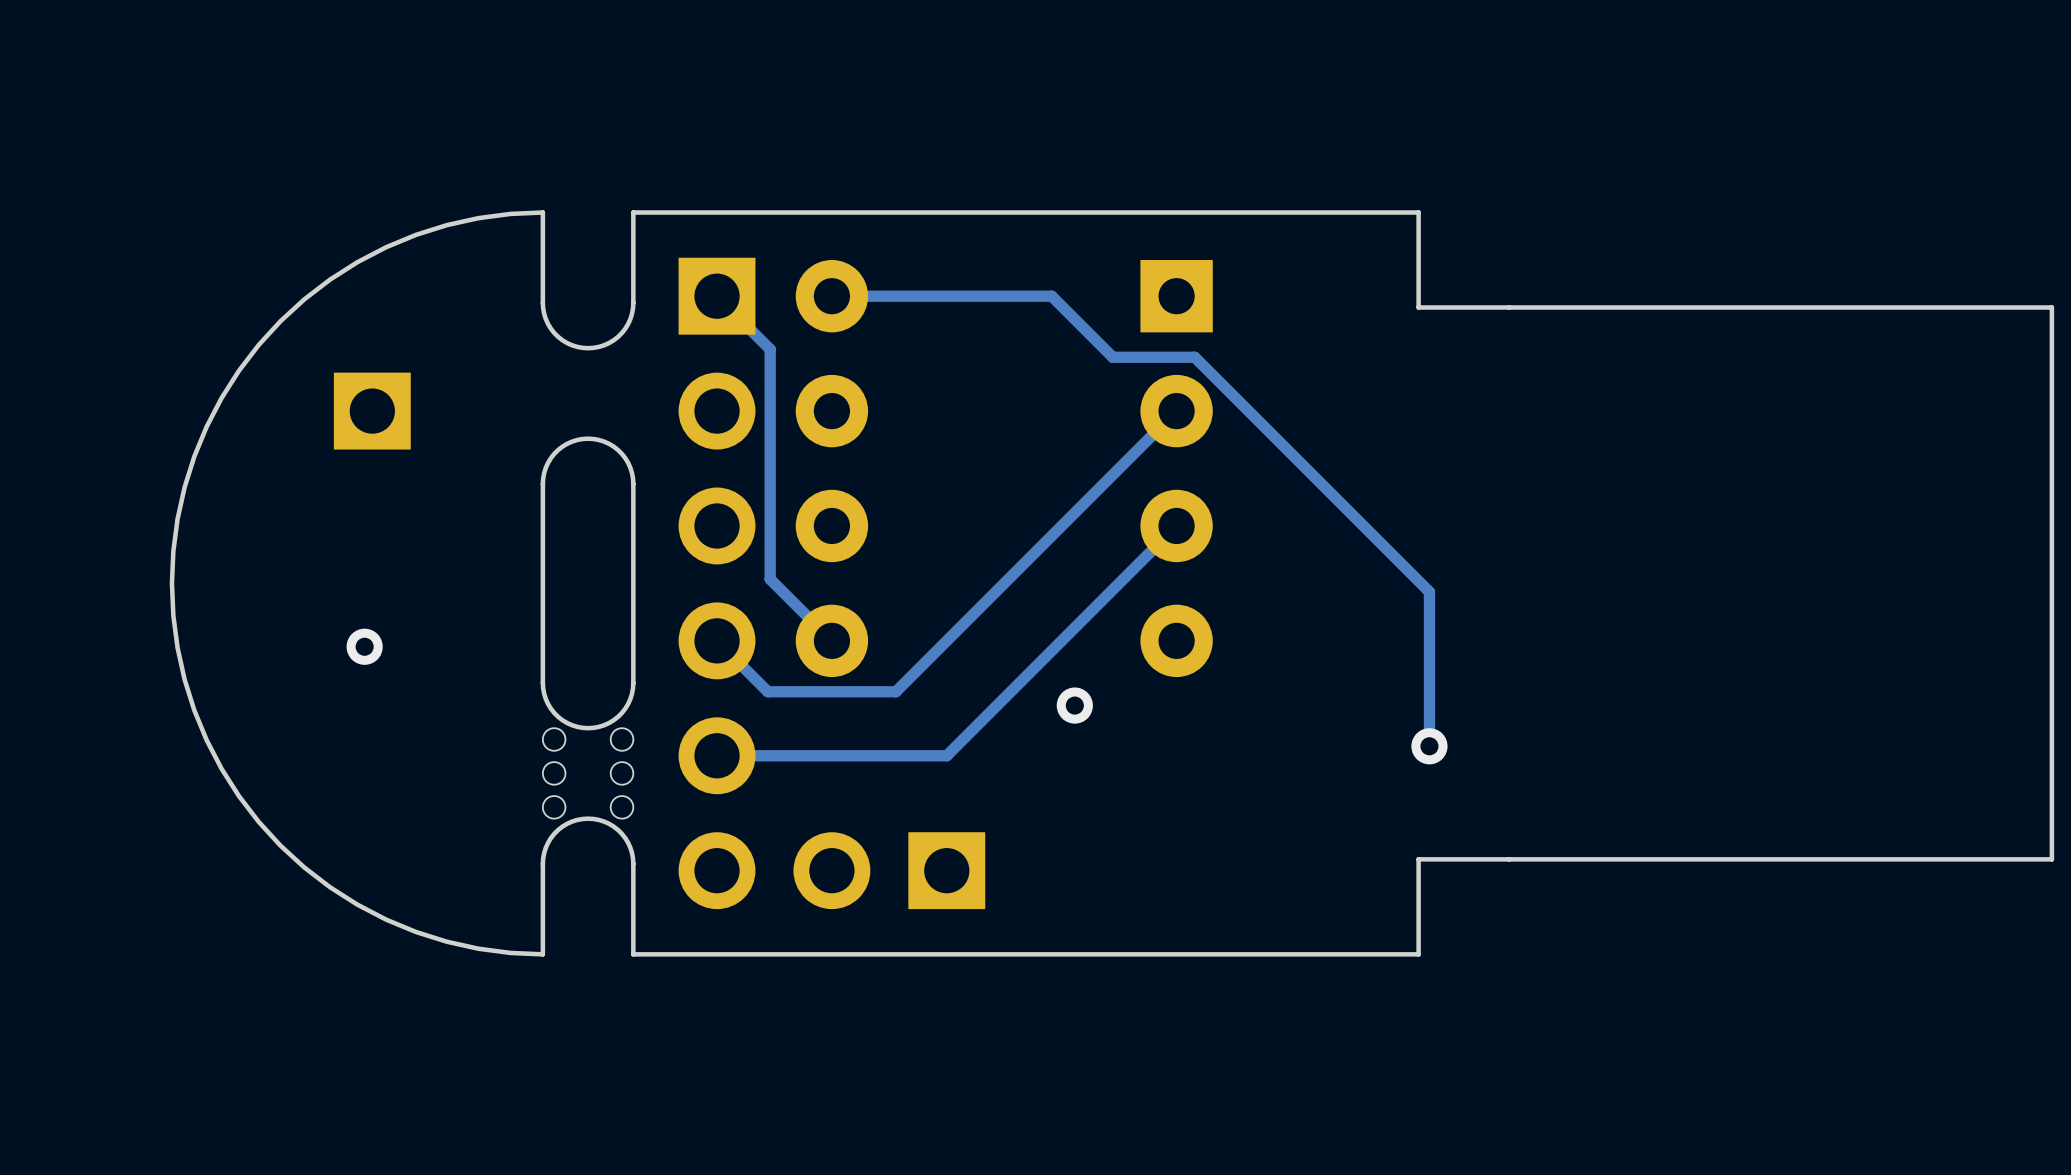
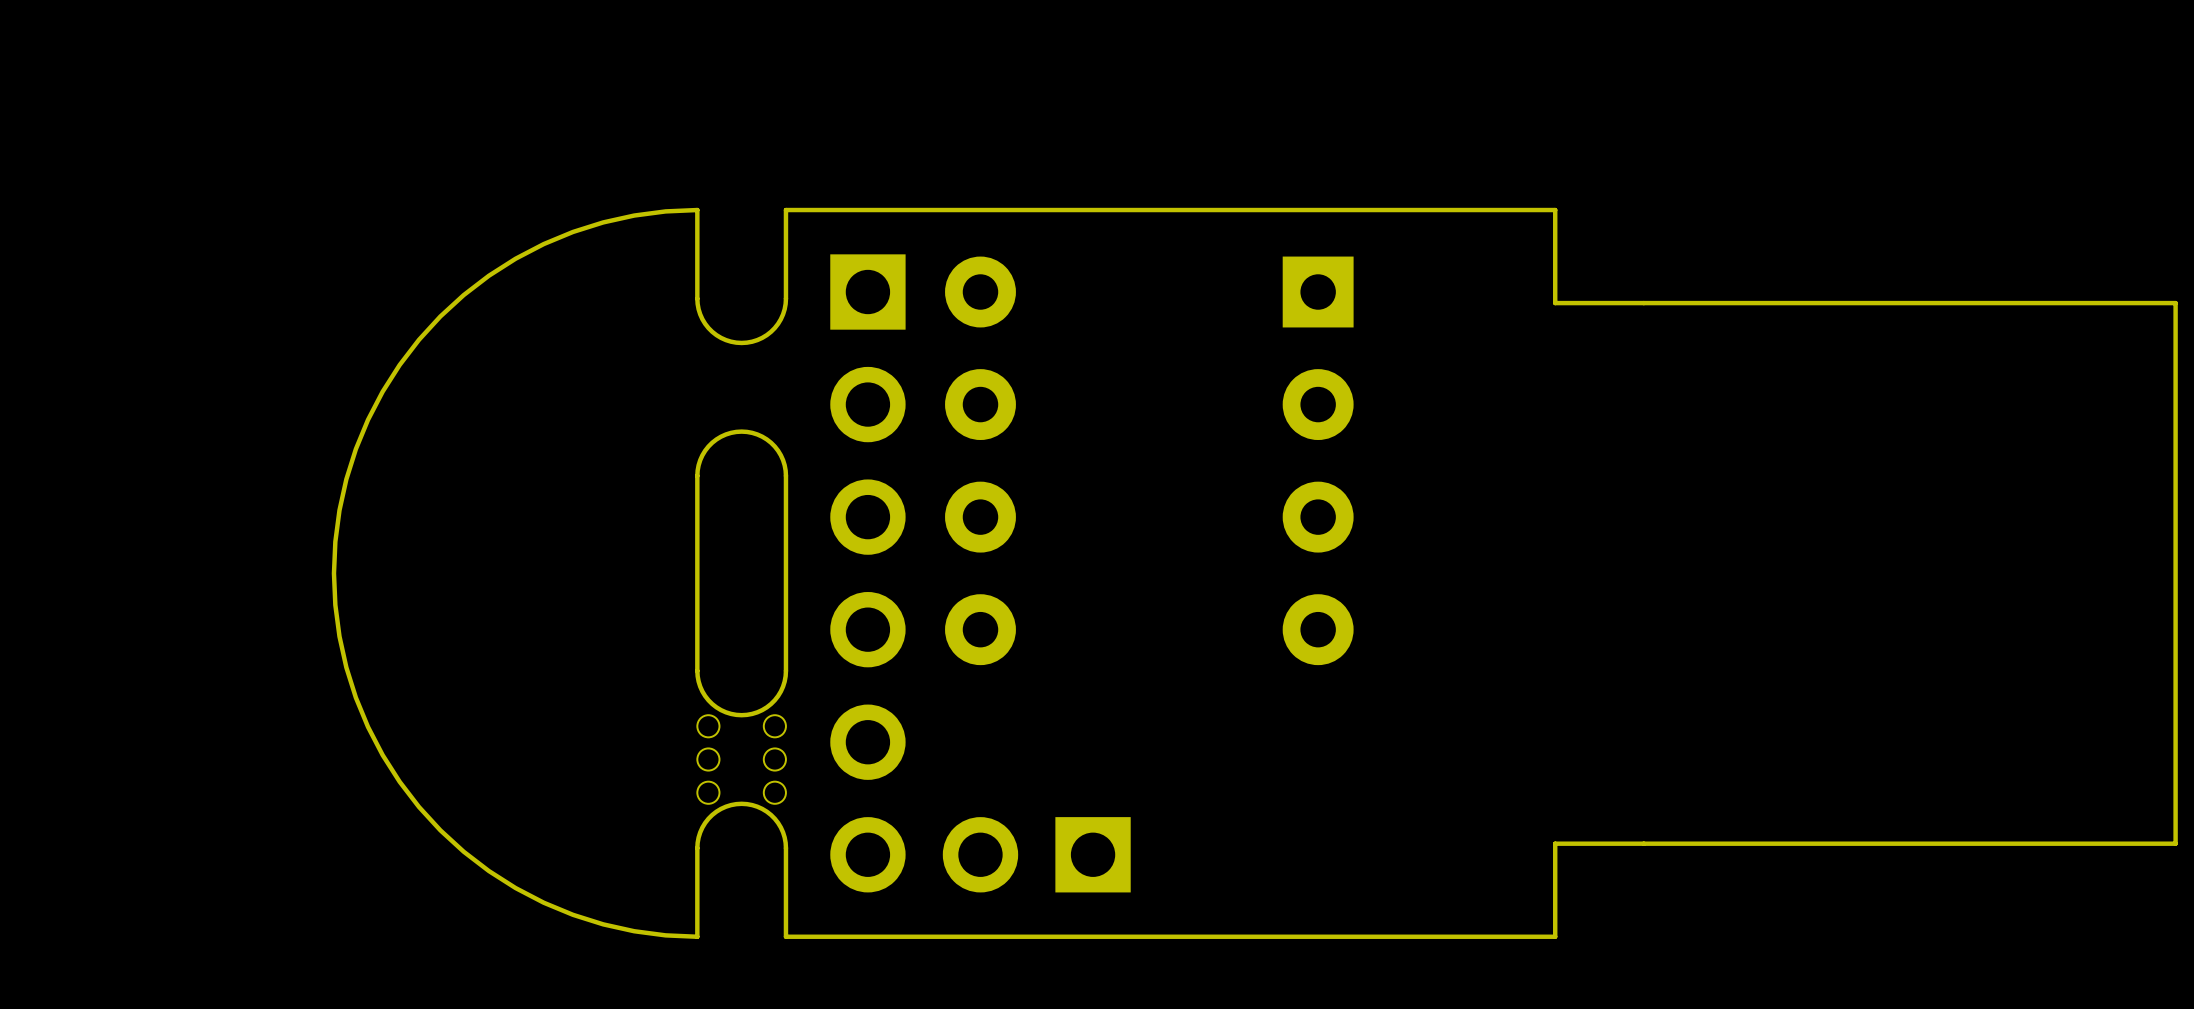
track: (717, 296) (770, 349) (770, 579) (831, 640) -> none
track: (831, 296) (1051, 296) (1112, 357) (1194, 357) (1429, 591) (1429, 746) -> none
part: (372, 411) -> none
track: (1176, 411) (895, 691) (767, 691) (717, 640) -> none
track: (1176, 525) (946, 755) (717, 755) -> none
via: (364, 646) -> none
via: (1074, 705) -> none
via: (1429, 746) -> none

